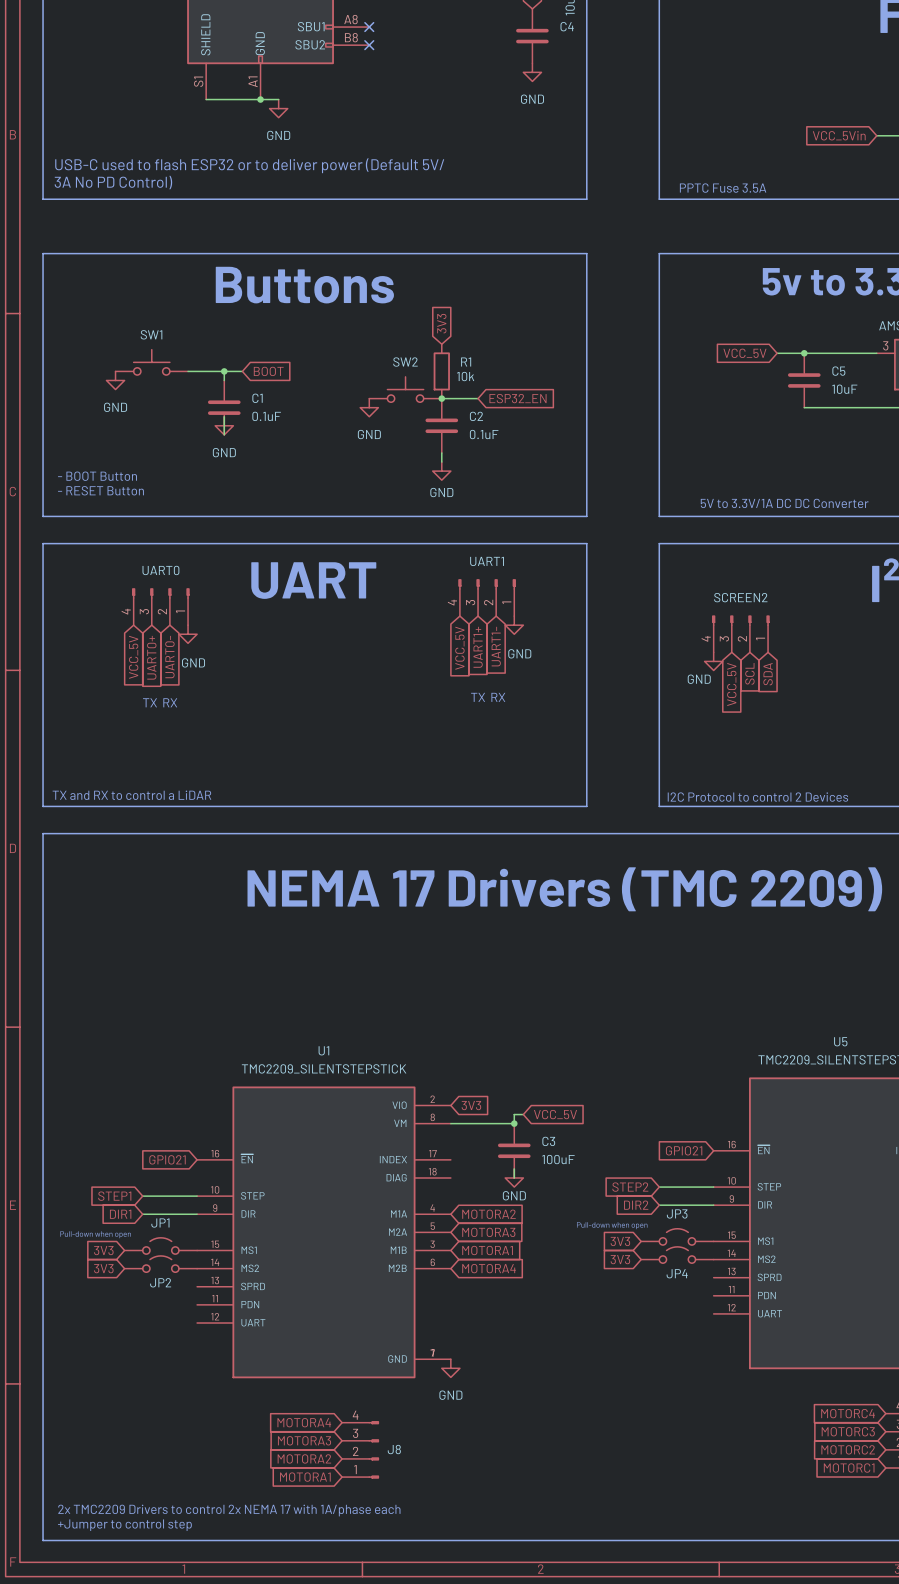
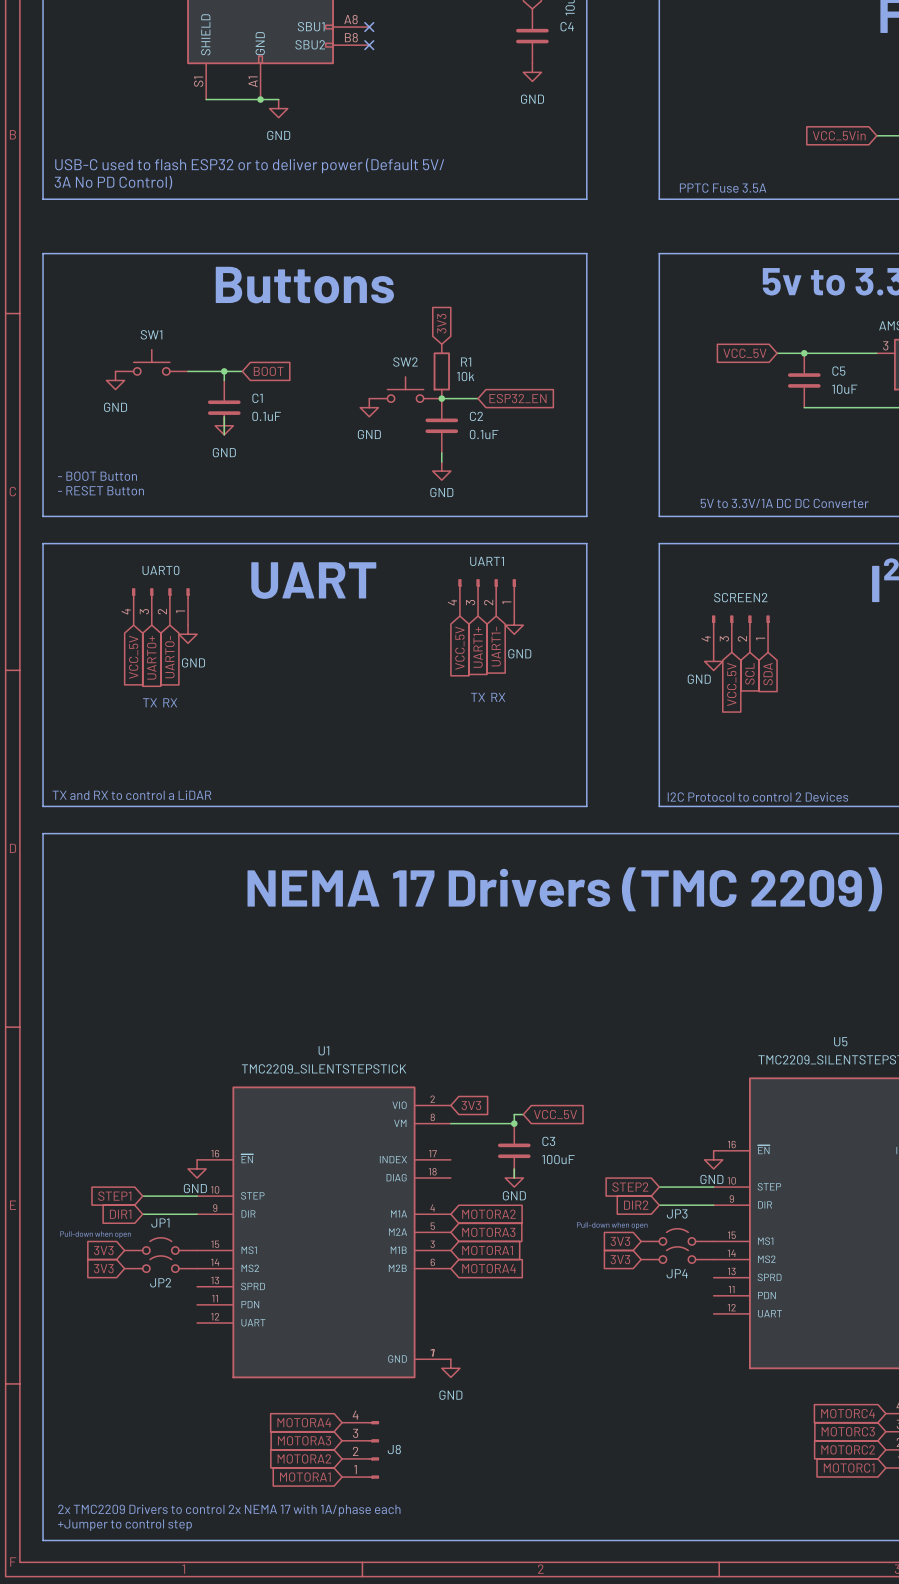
global label: GPIO21 (684, 1150) -> none
global label: GPIO21 (167, 1159) -> none
power symbol: none -> GND (713, 1159)
power symbol: none -> GND (197, 1168)

